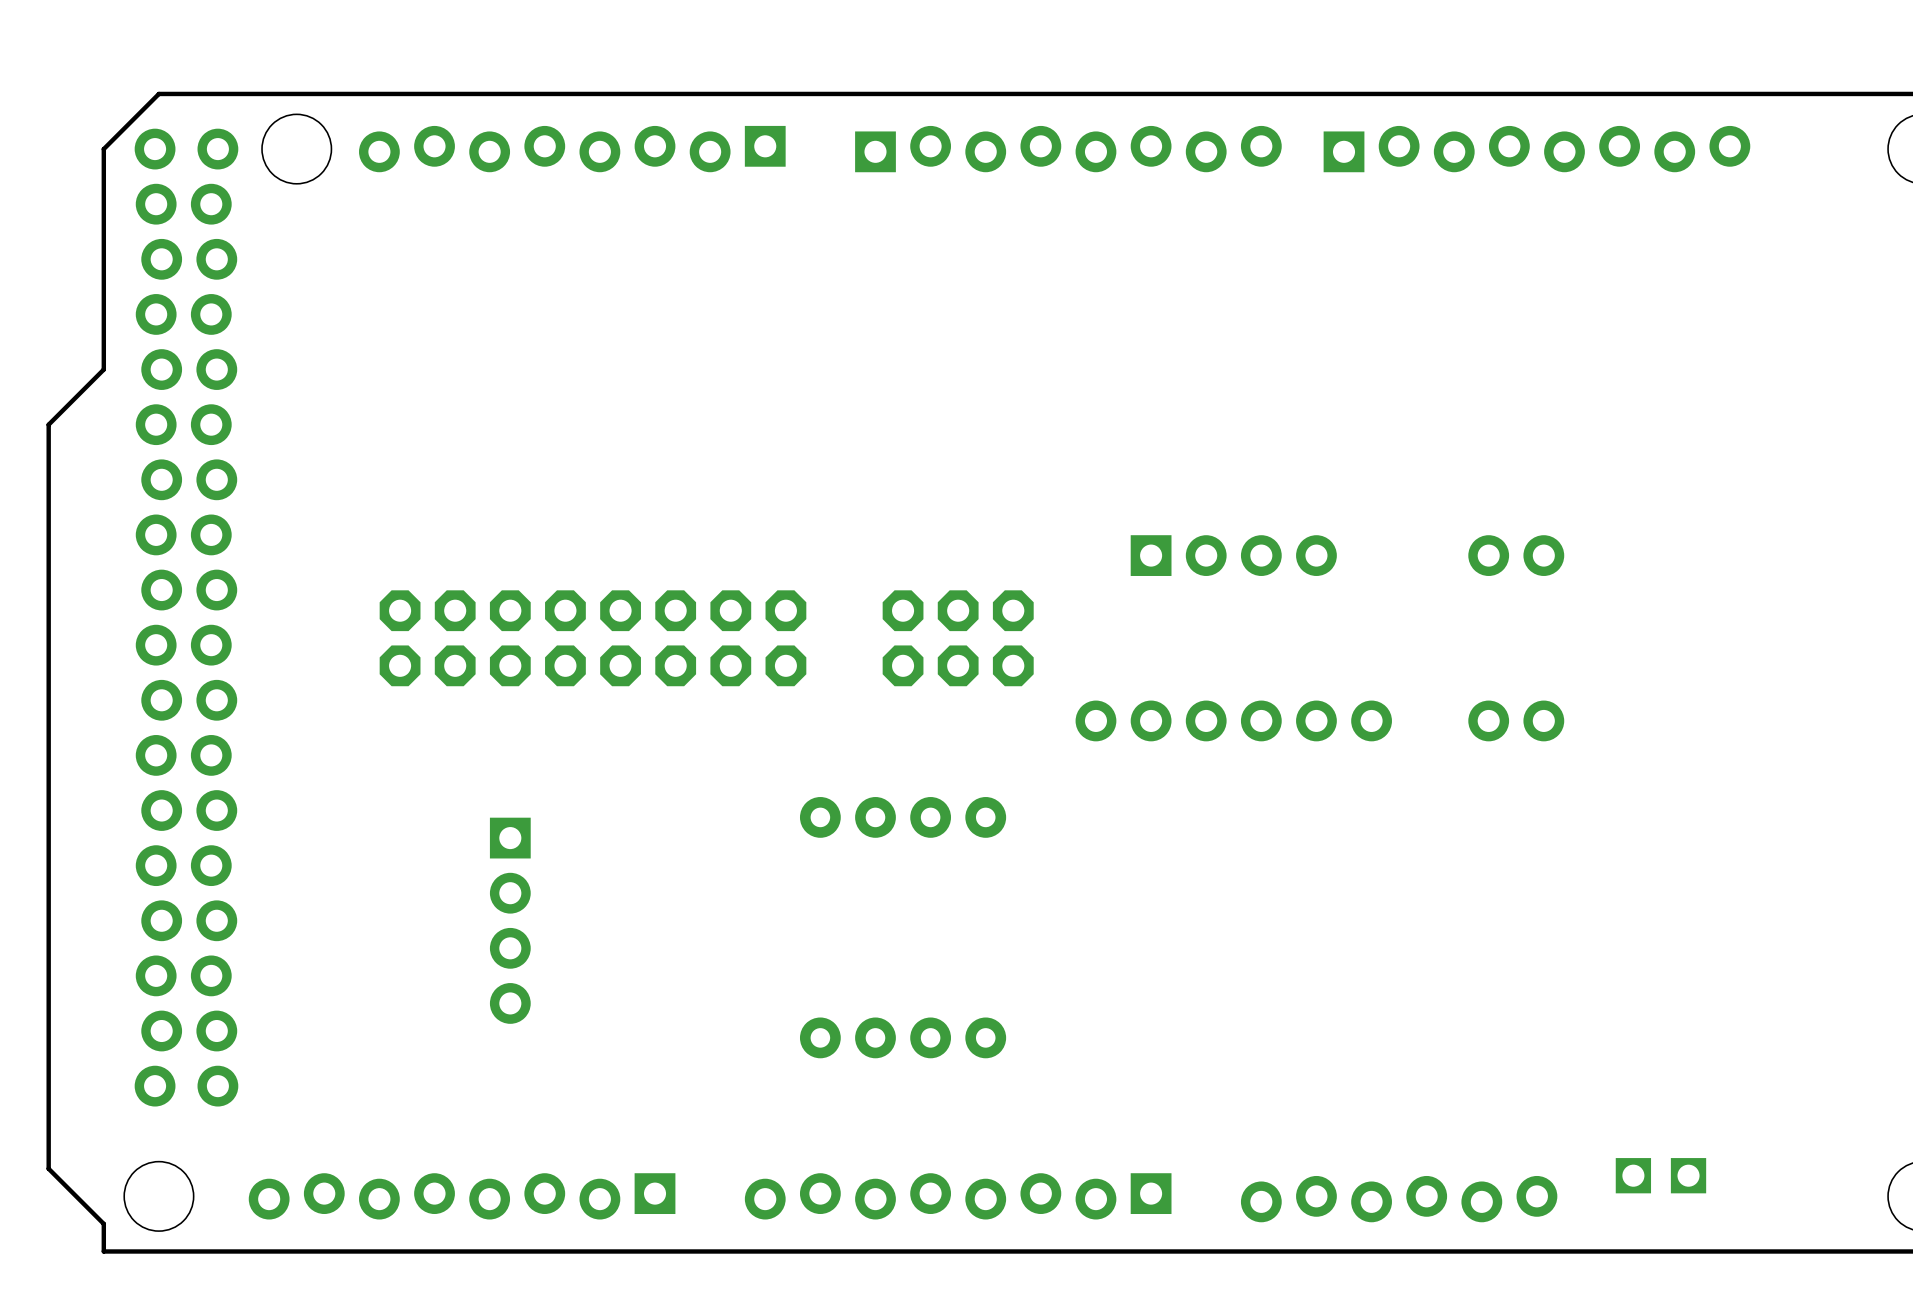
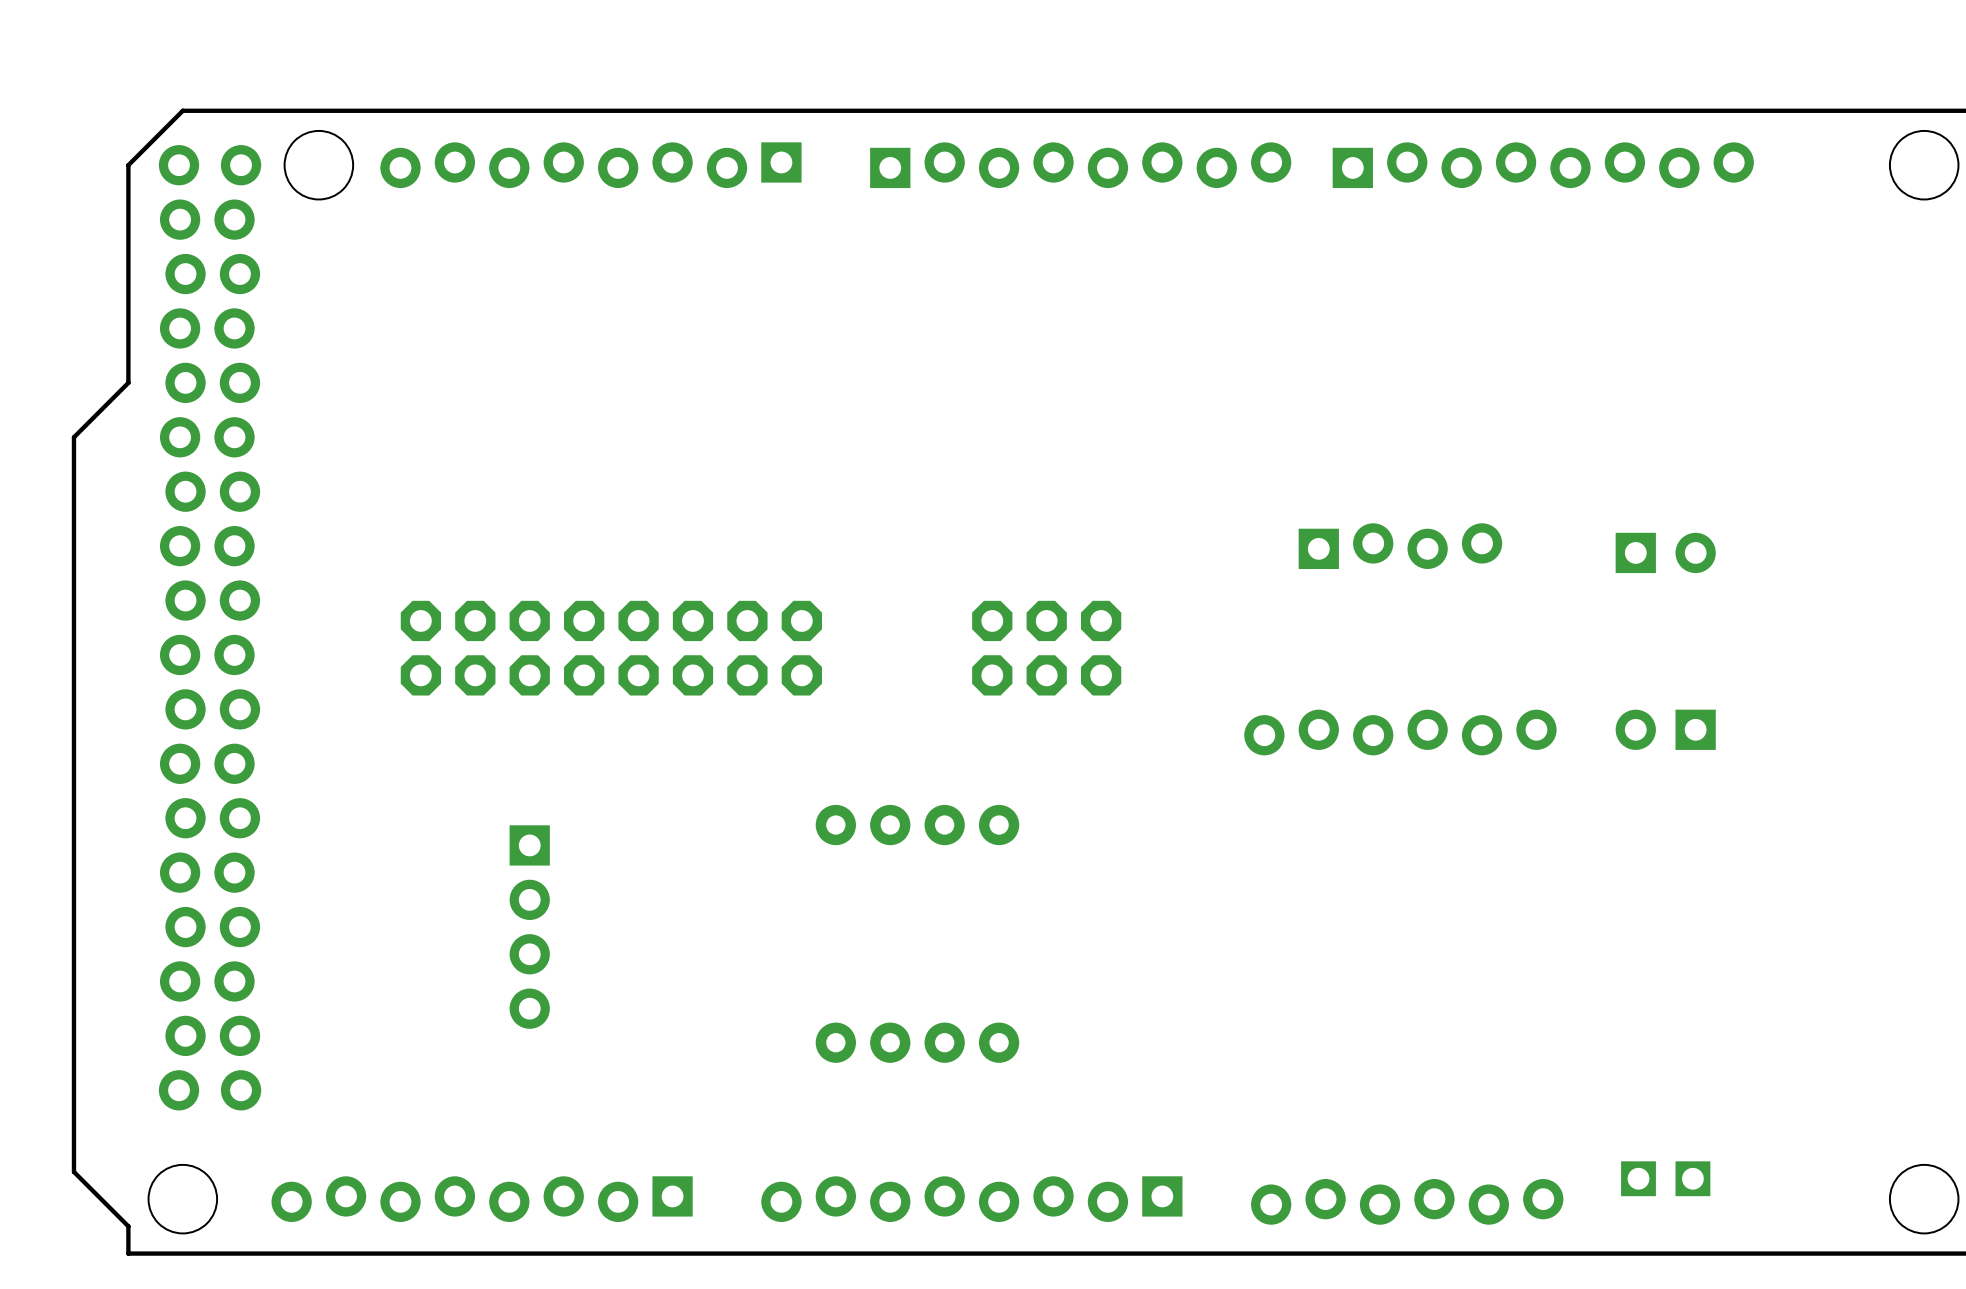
part: none -> (1400, 546)
part: none -> (1665, 552)
part: (1233, 555) -> none
part: (1516, 555) -> none
part position: (958, 638) -> (1046, 648)
part: (1233, 720) -> none
part: (1516, 720) -> none
part: none -> (1665, 729)
part: none -> (1400, 732)

